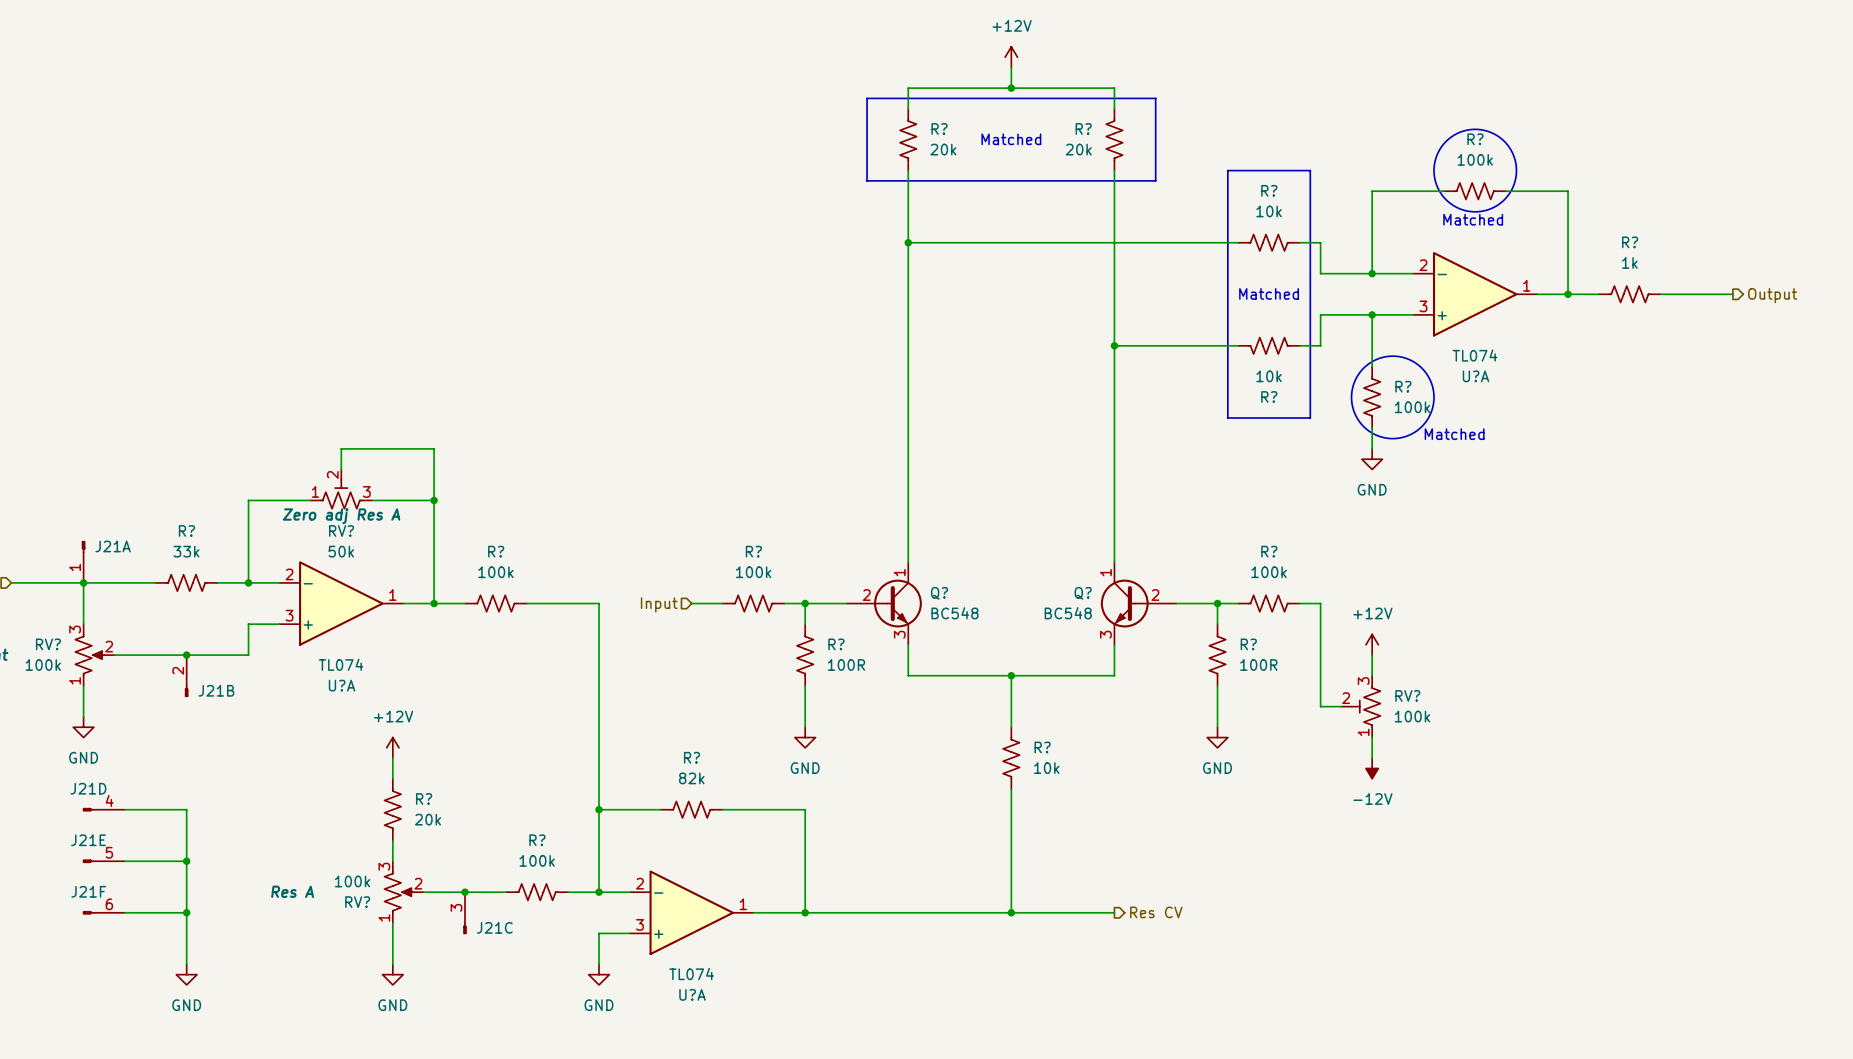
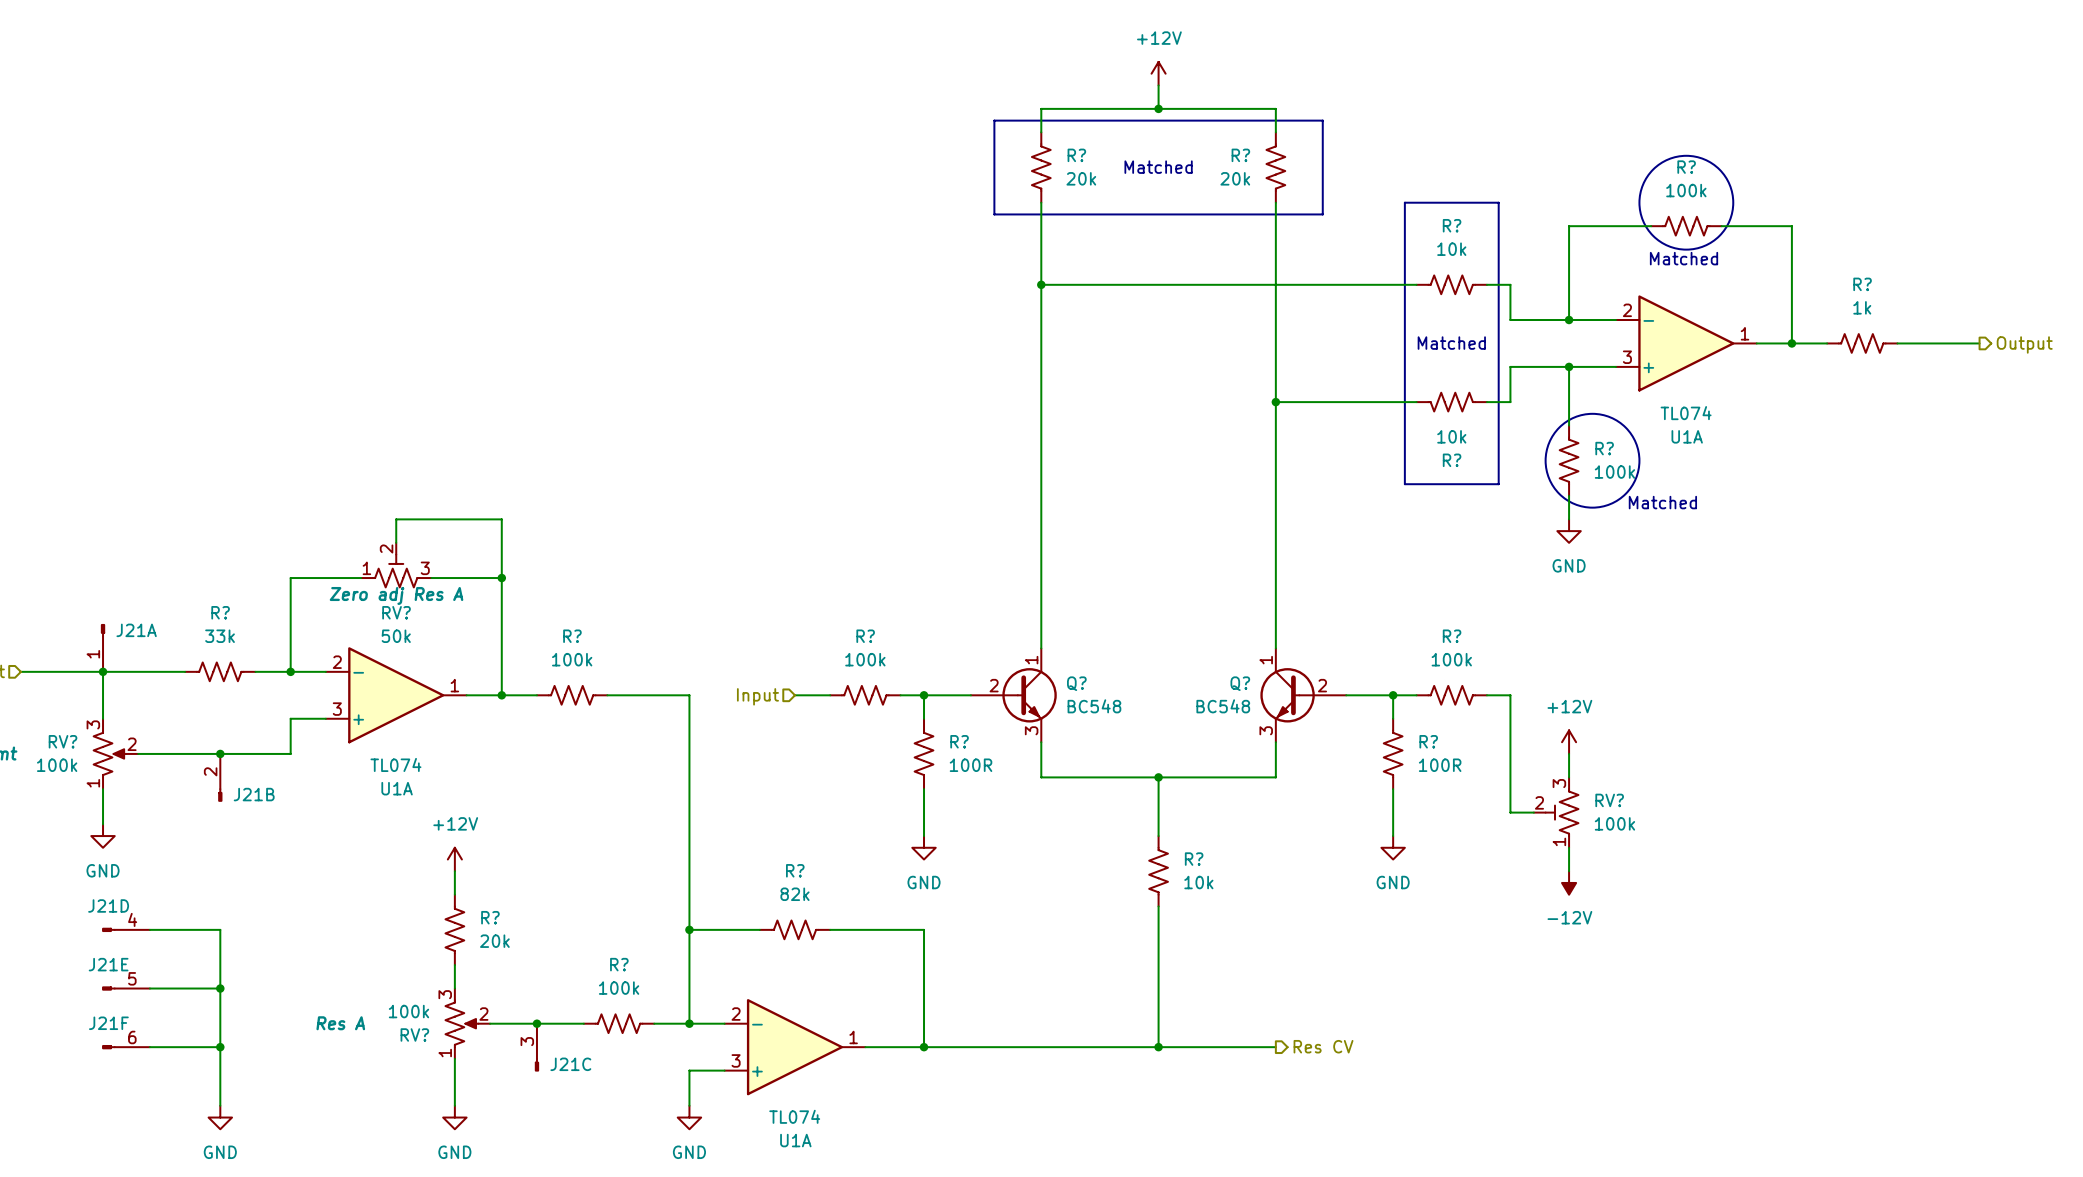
U?A name: U?A (1475, 376) -> U1A (1687, 436)
U?A name: U?A (342, 685) -> U1A (397, 788)
U?A name: U?A (692, 994) -> U1A (795, 1140)

